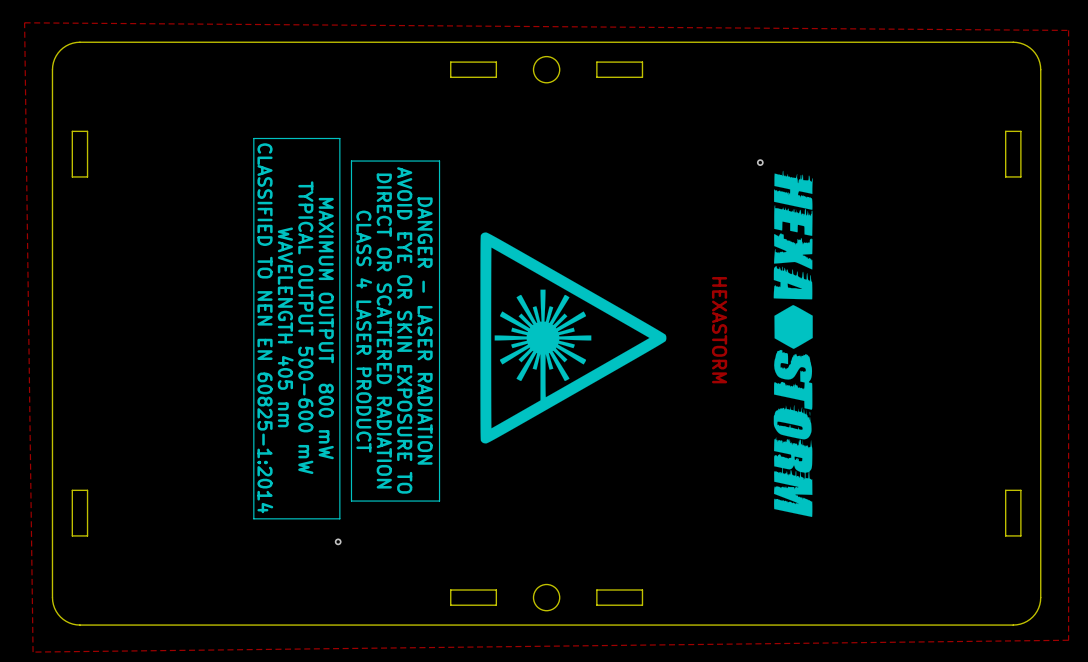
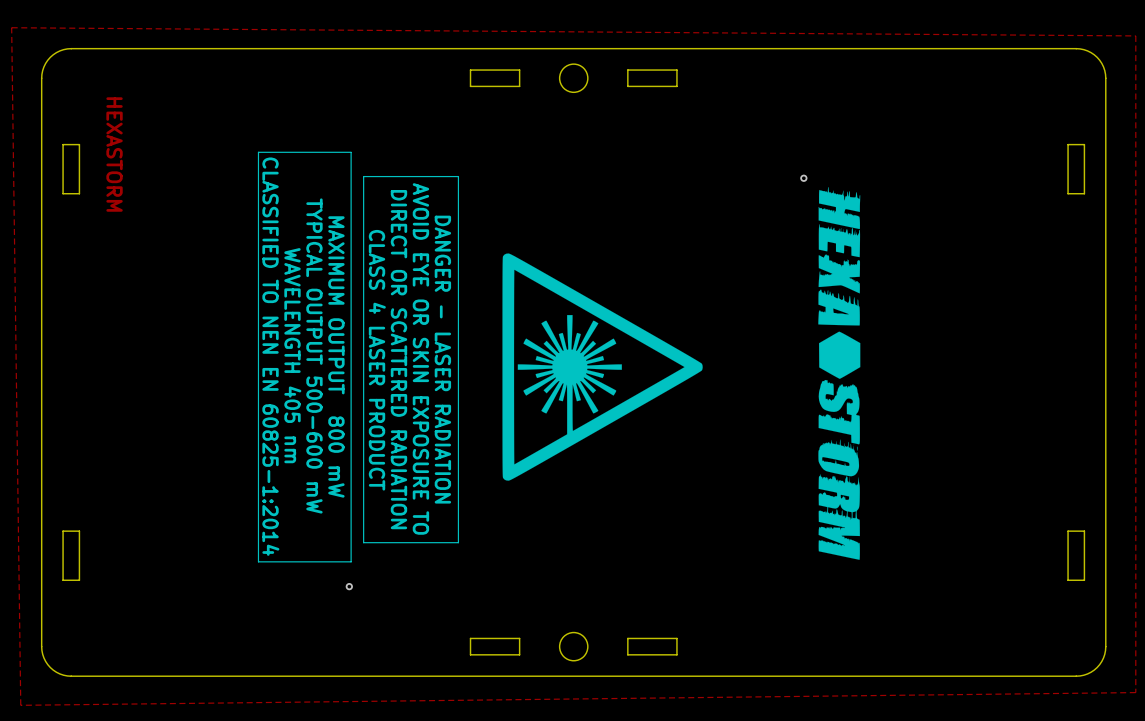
text: none -> HEXASTORM (114, 154)
text: HEXASTORM (719, 330) -> none

